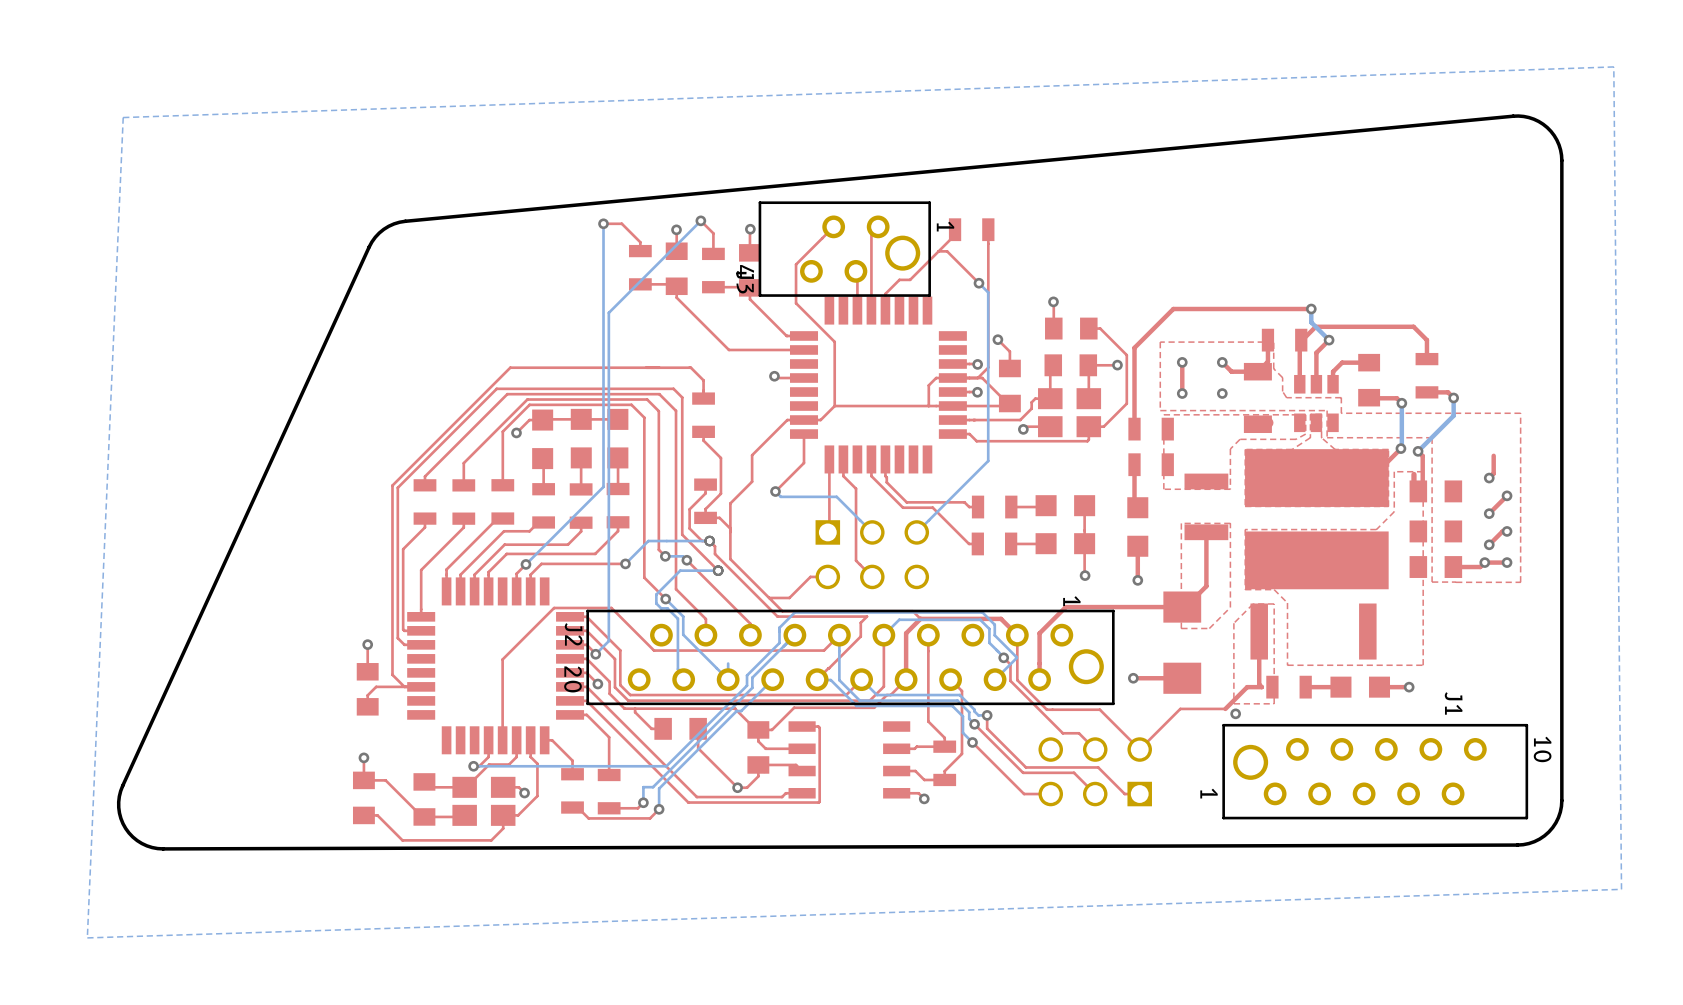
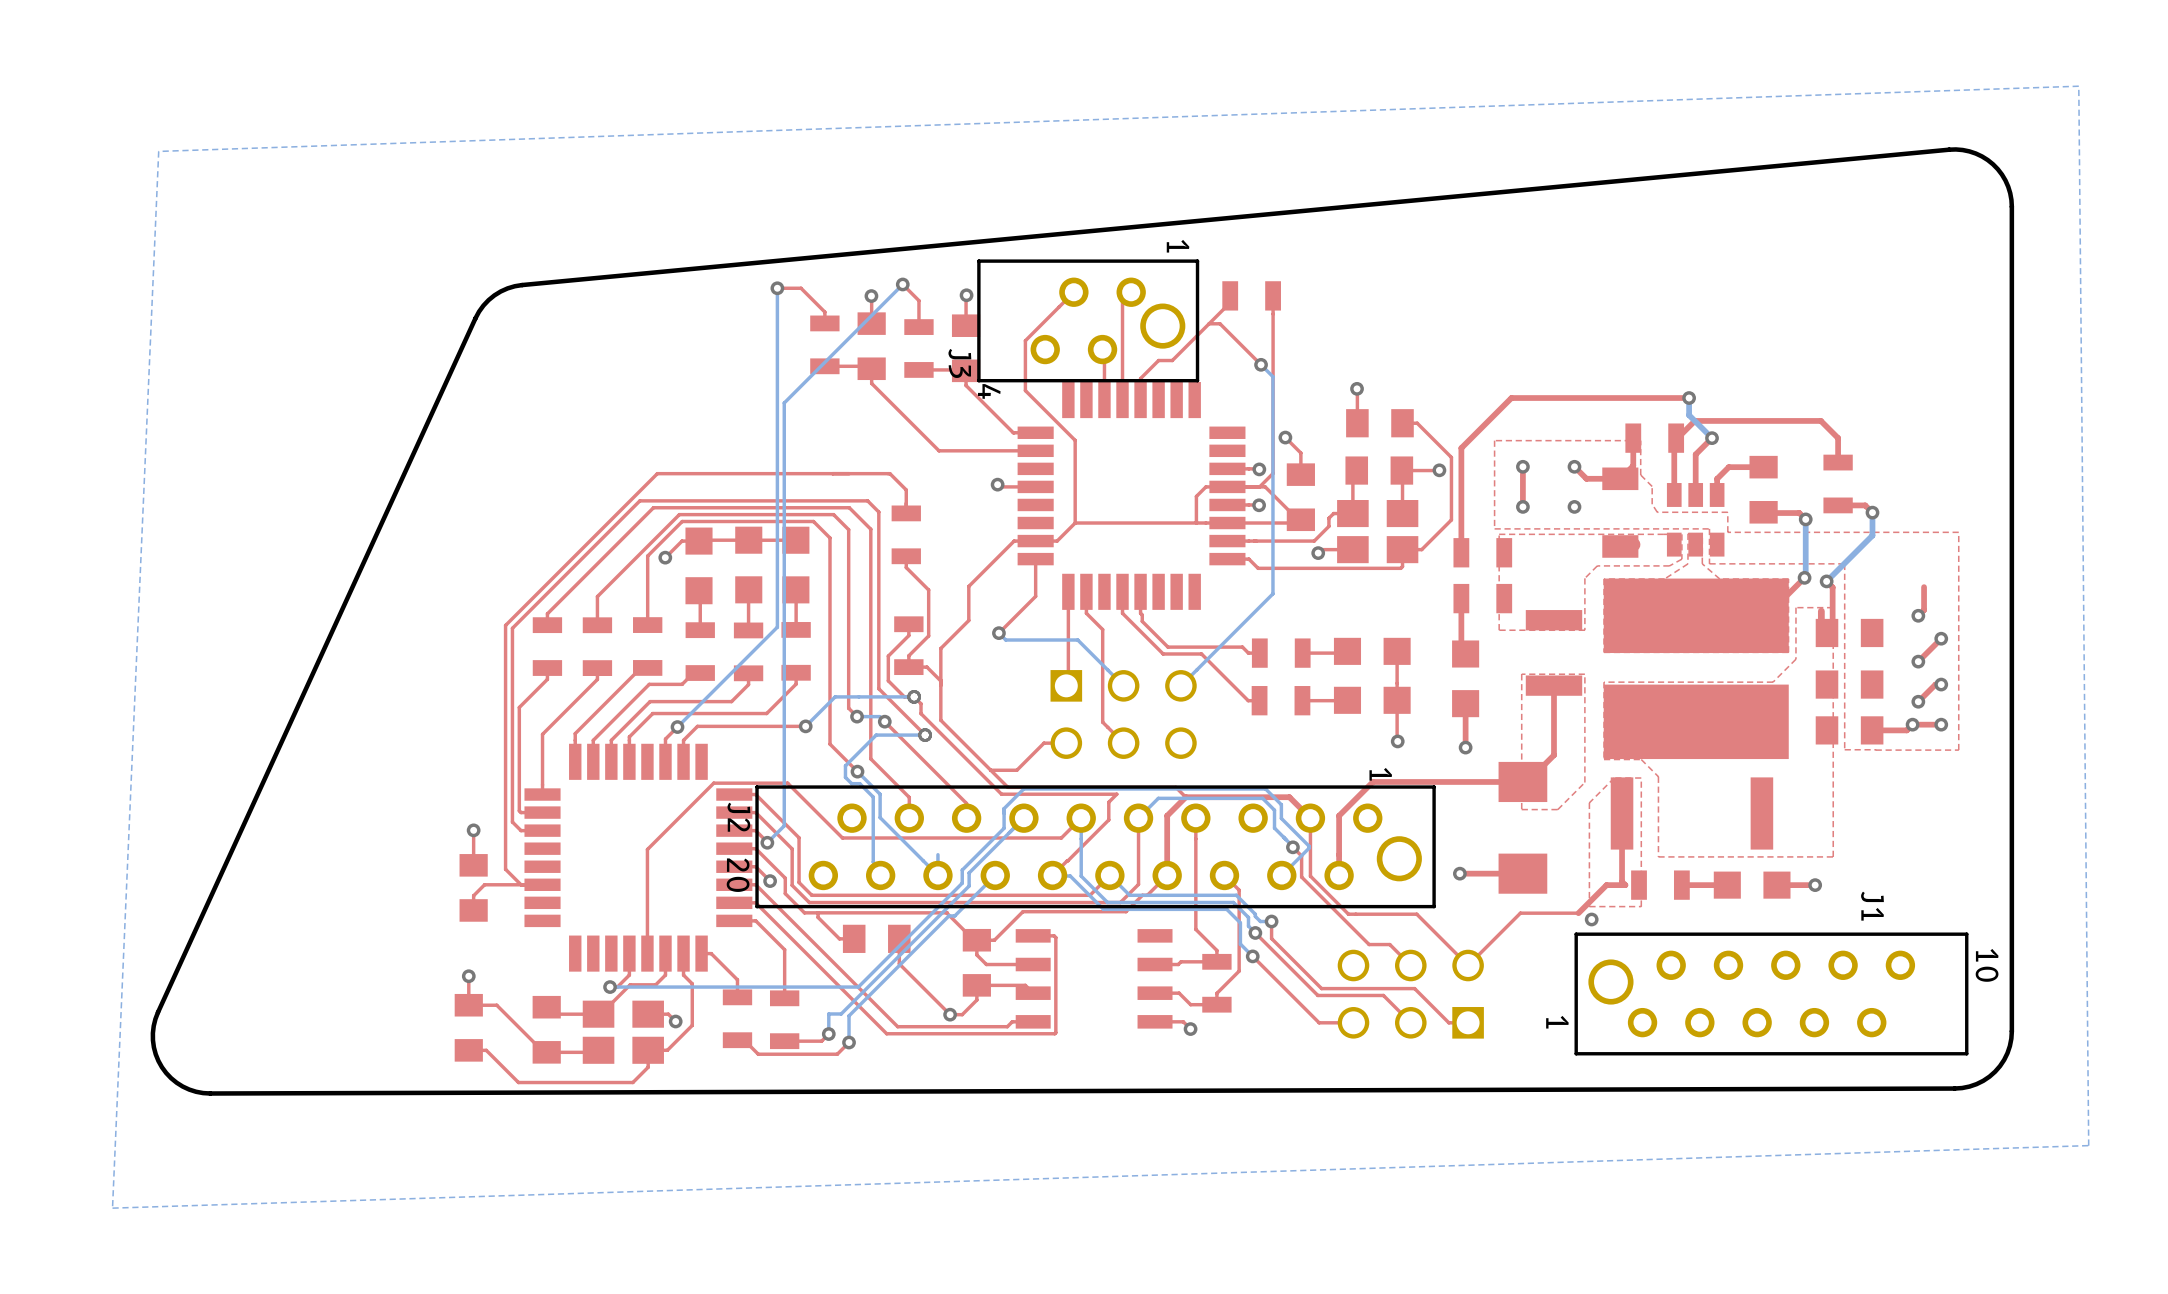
J3 text position: 1 (945, 226) -> 1 (1178, 246)
J3 text position: 4 (745, 270) -> 4 (989, 391)

